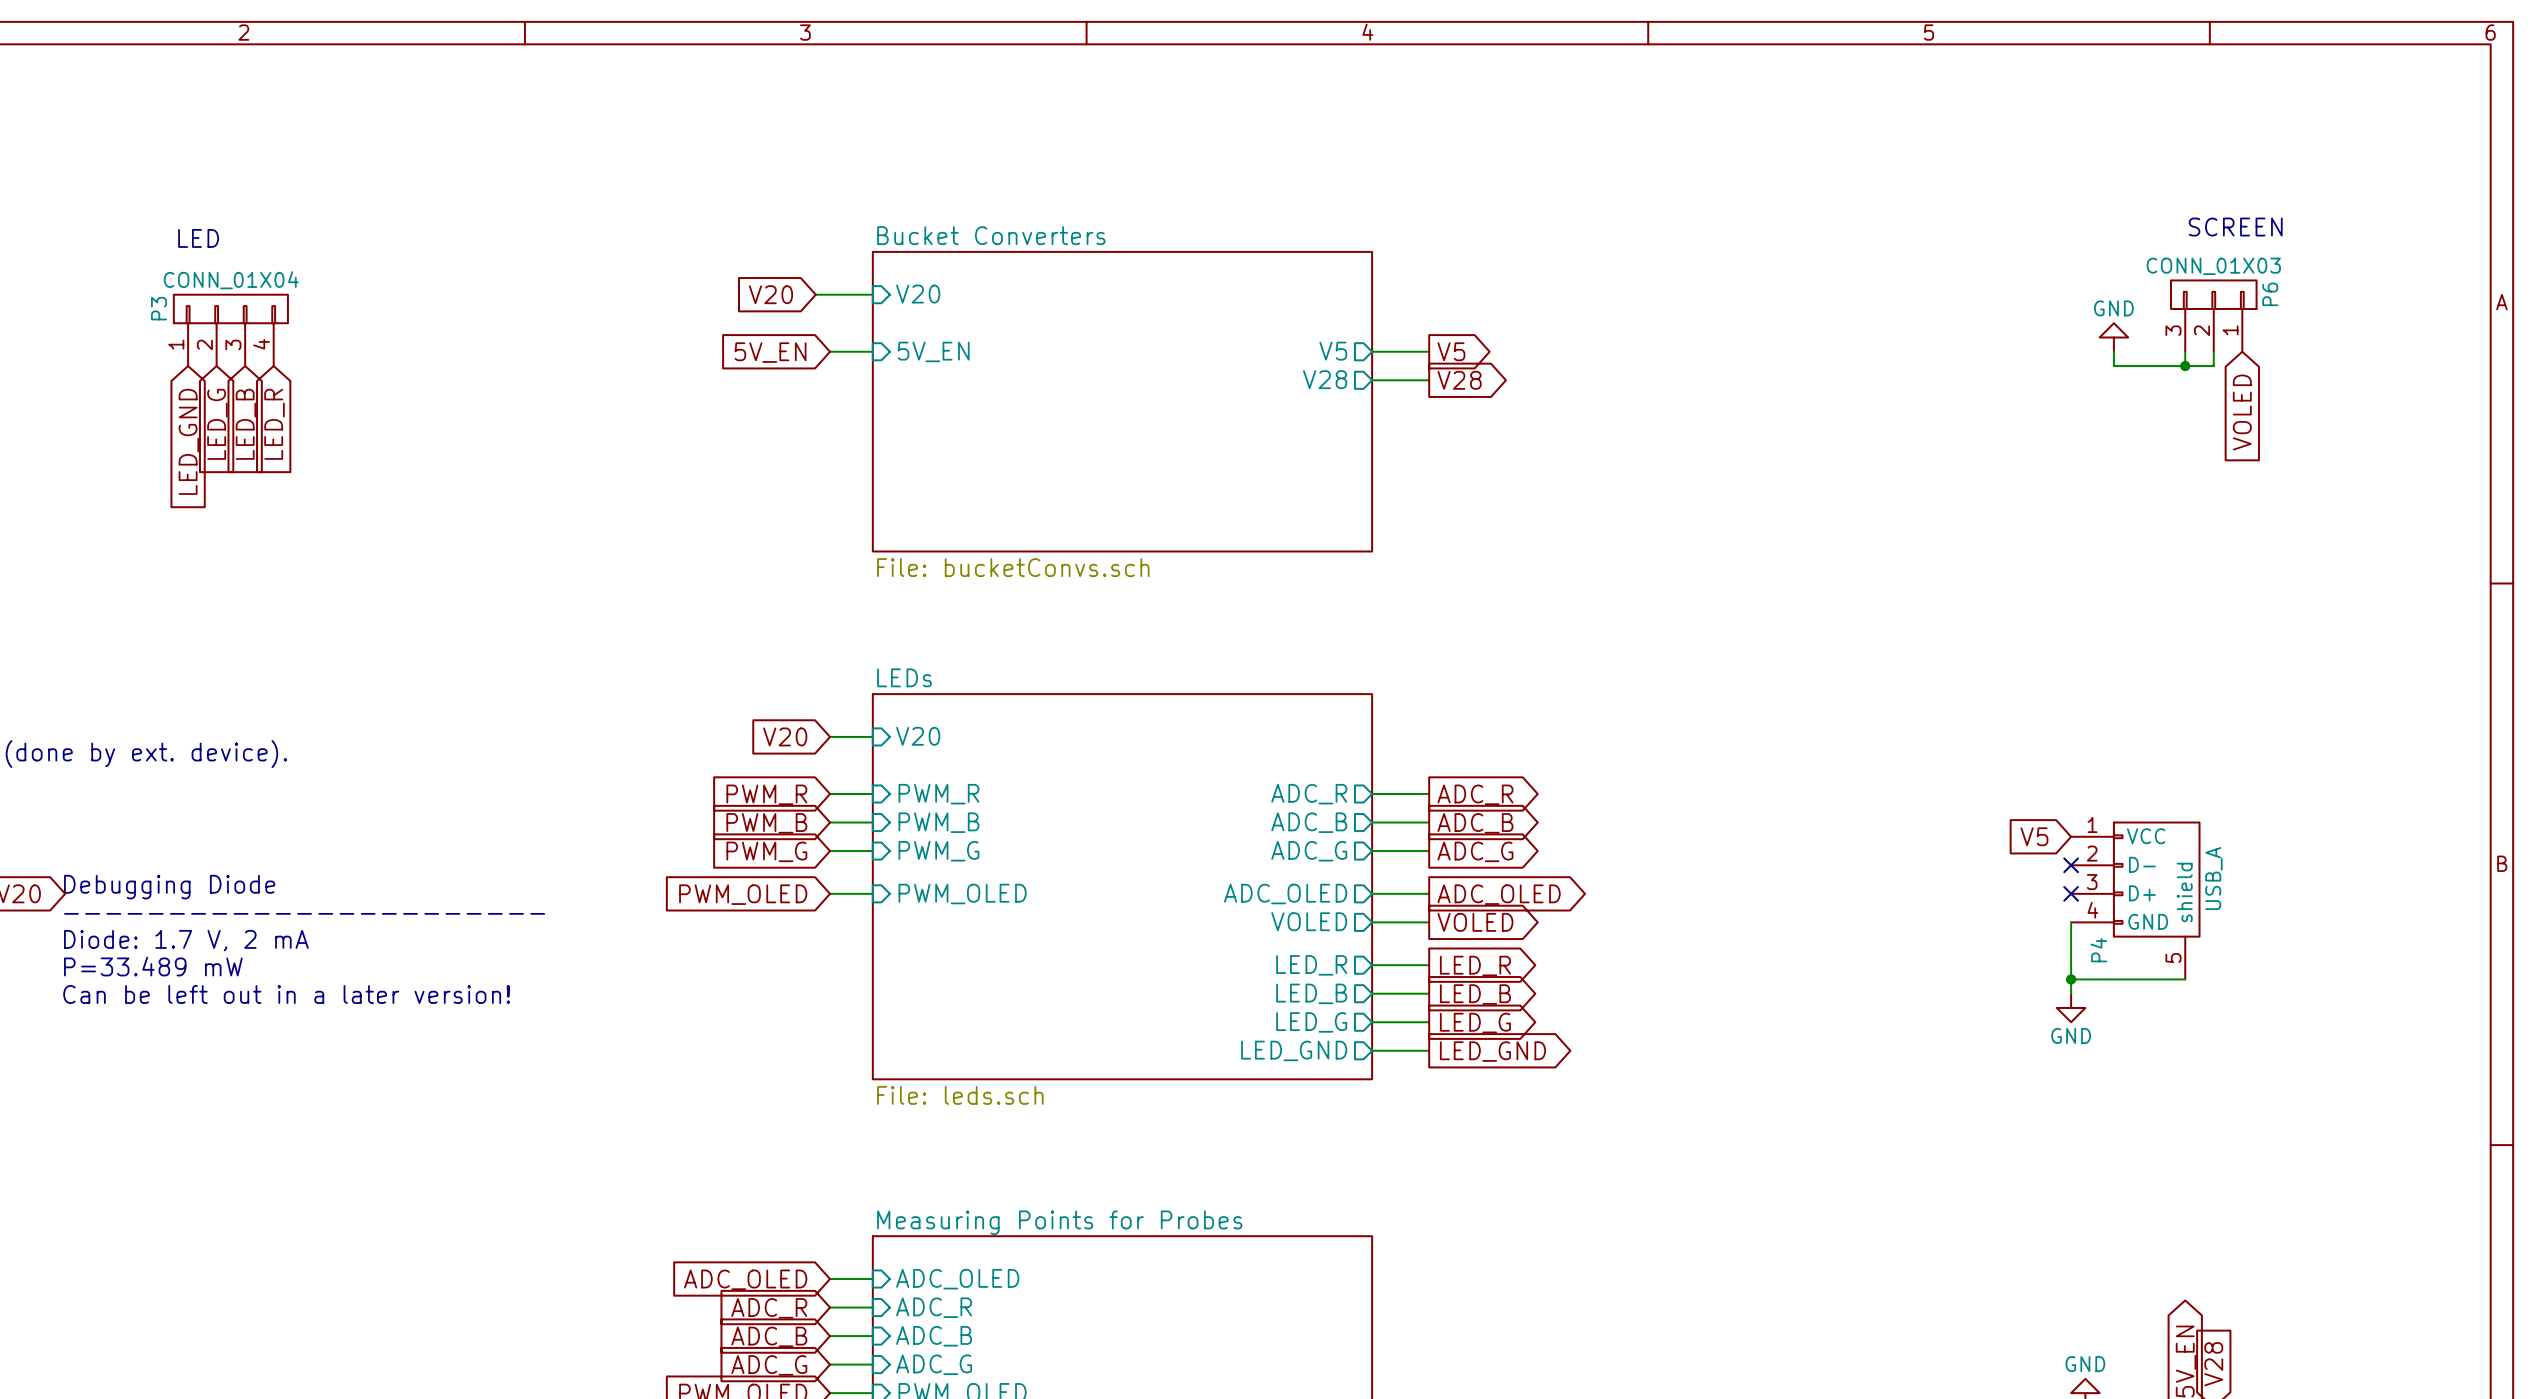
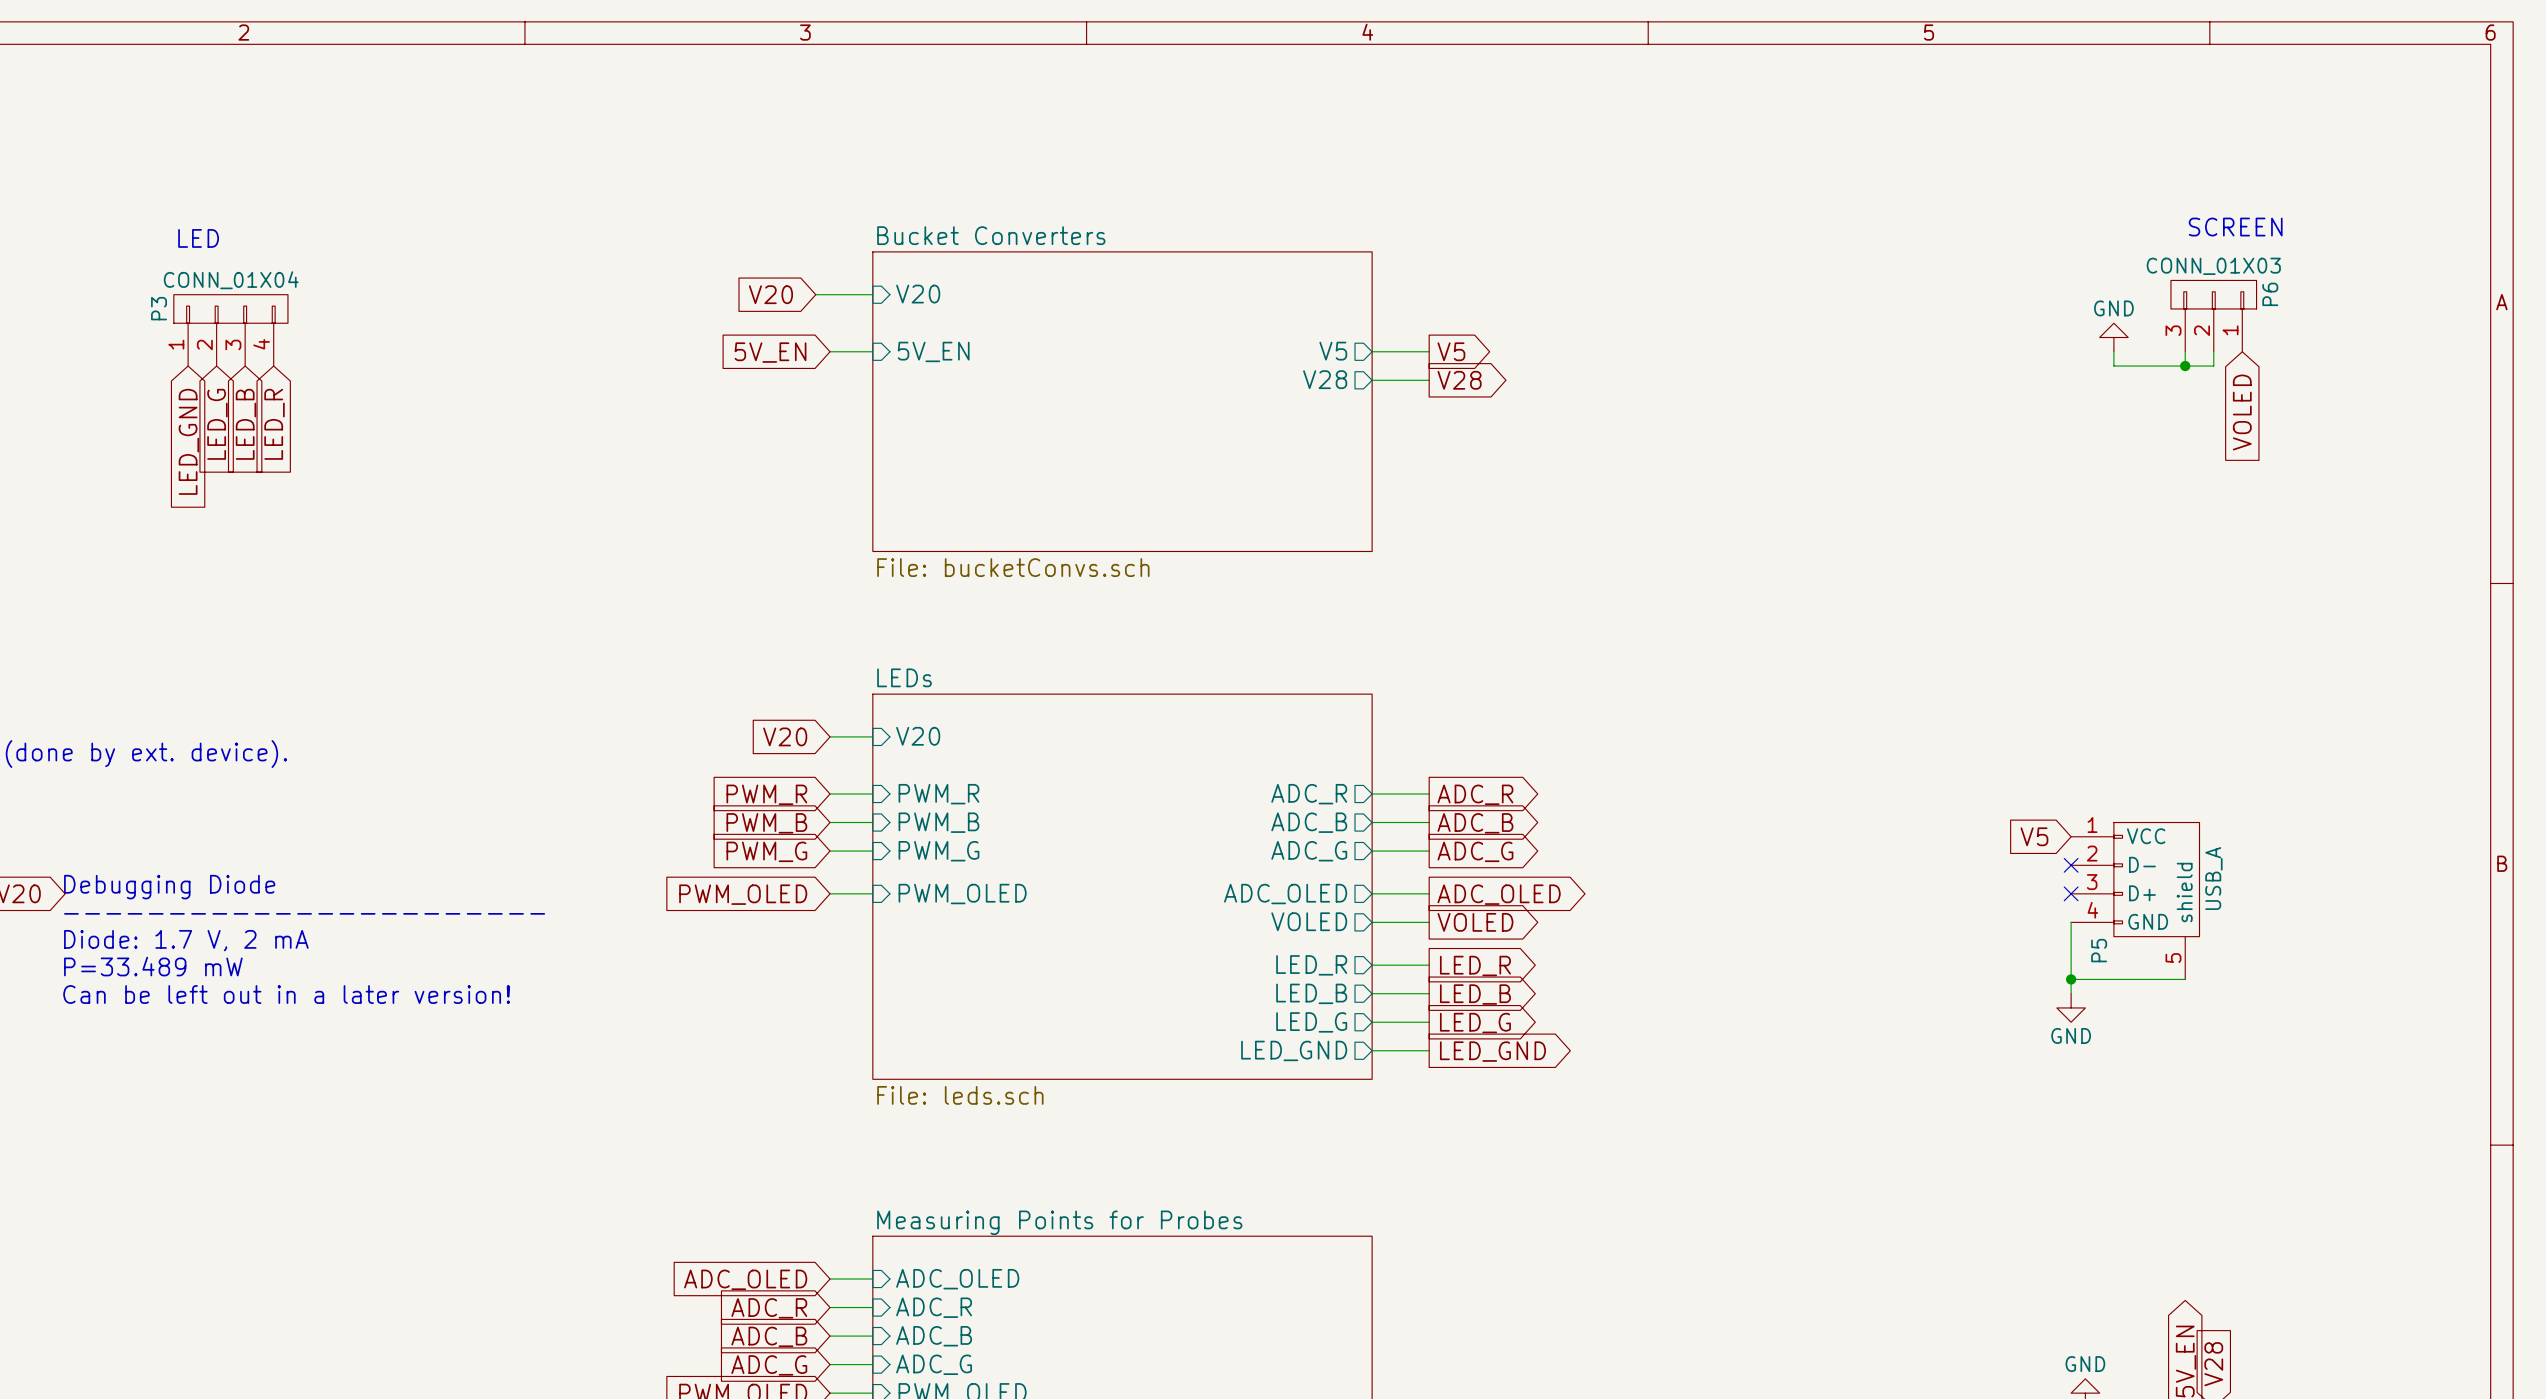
P4 name: P4 (2098, 950) -> P5 (2099, 950)

